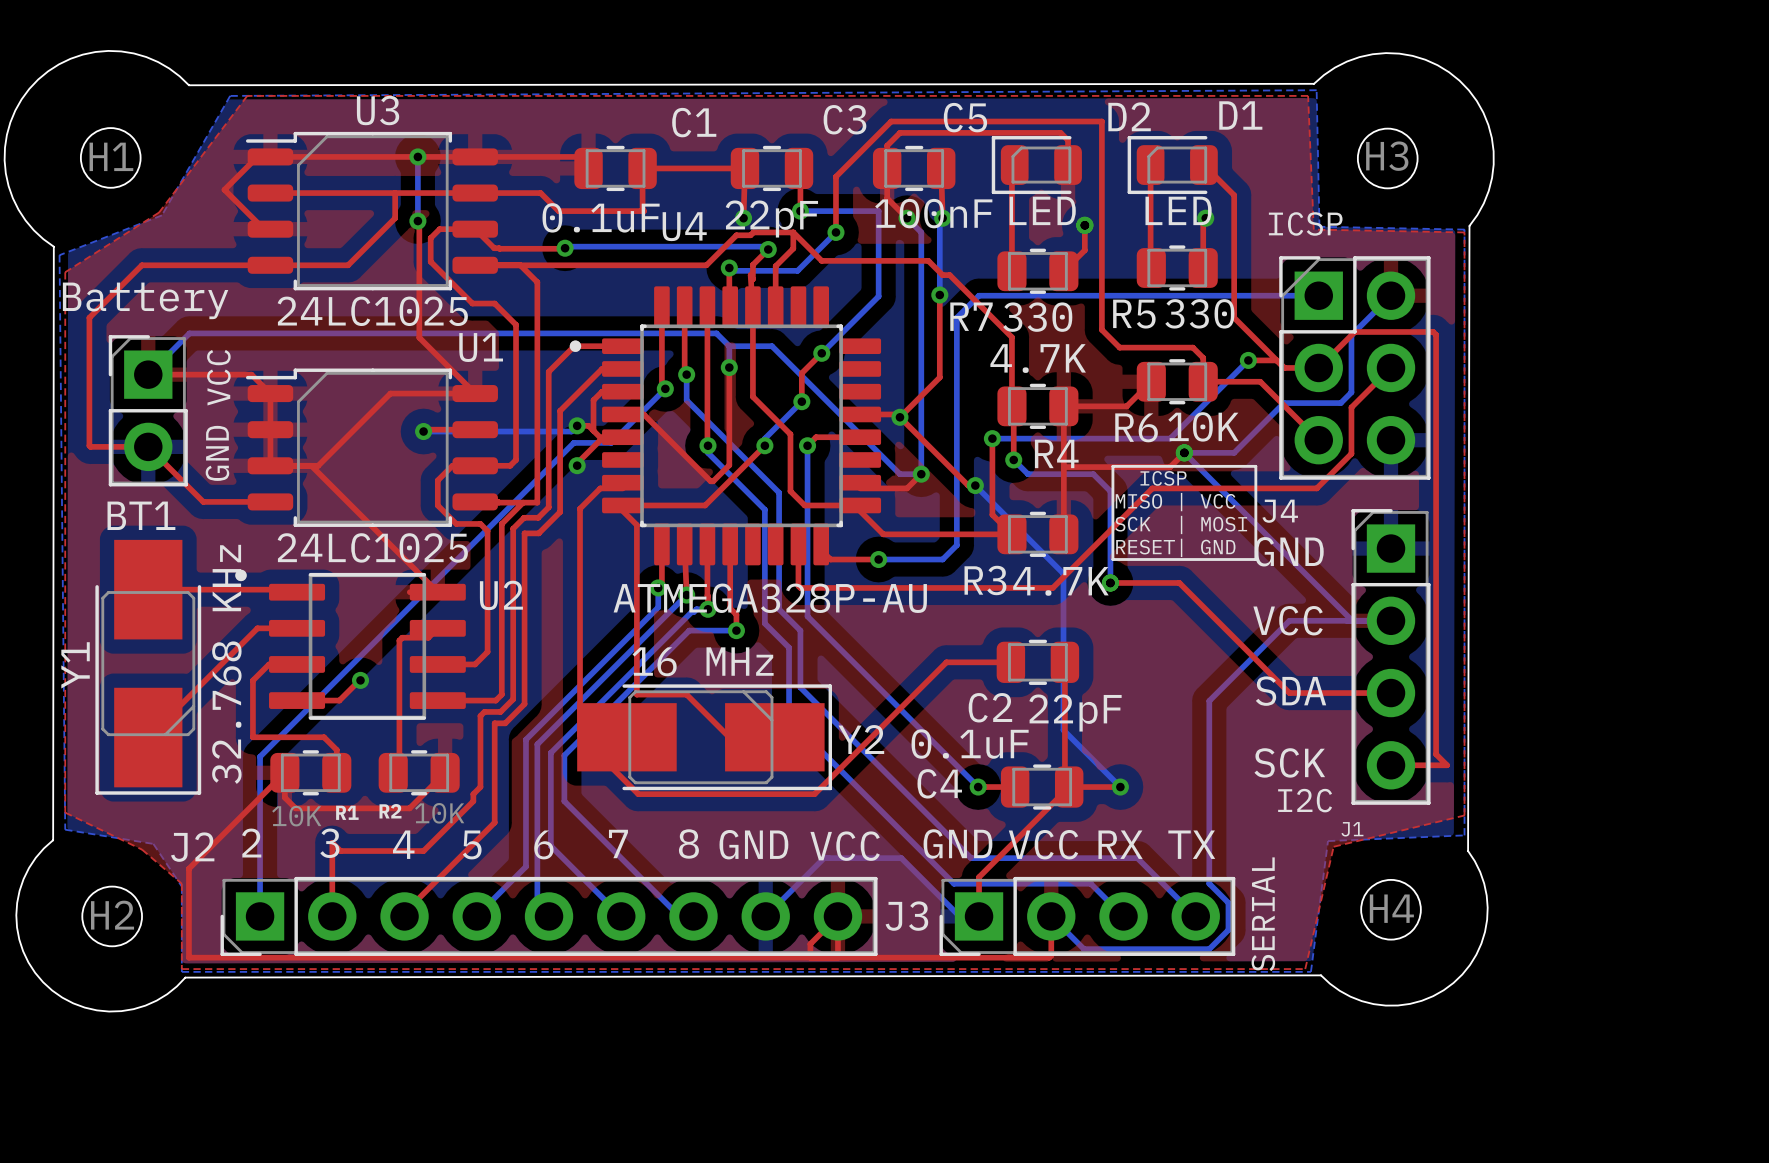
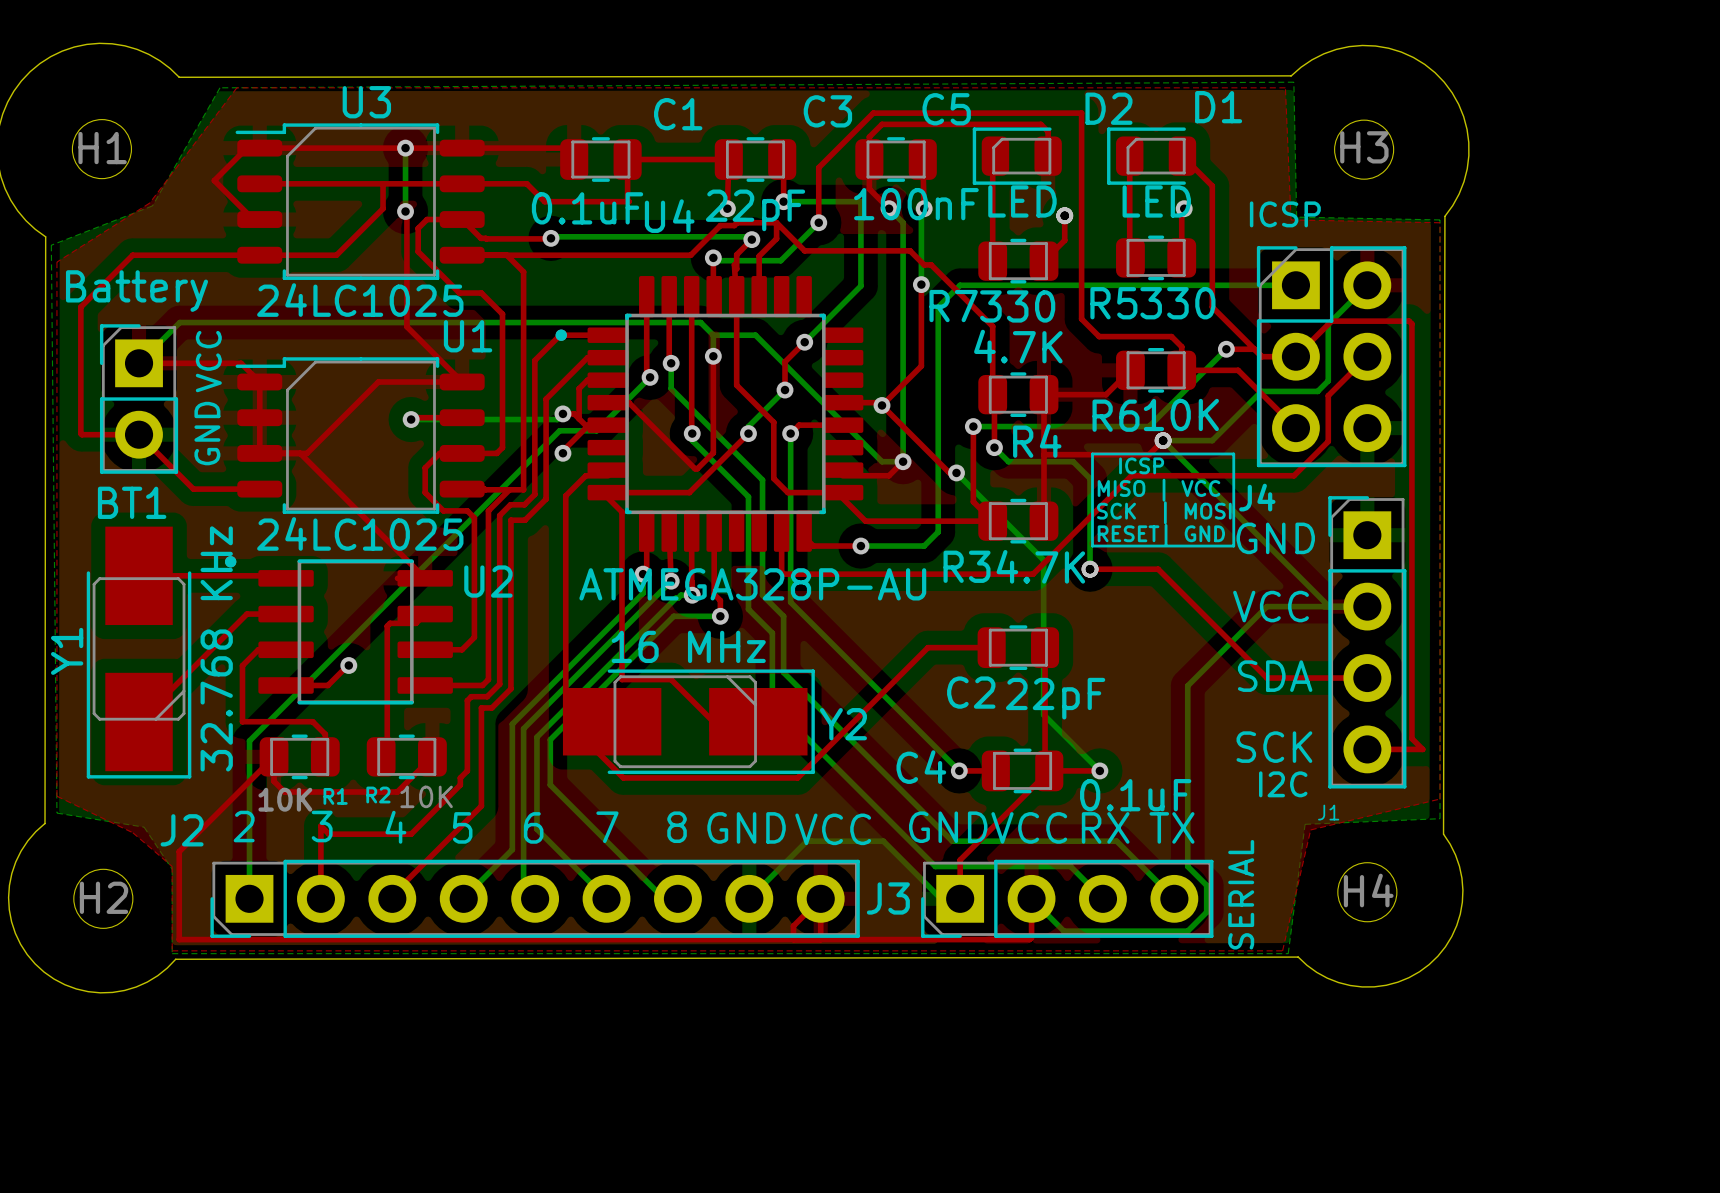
C4 value position: 0.1uF (970, 744) -> 0.1uF (1135, 795)

